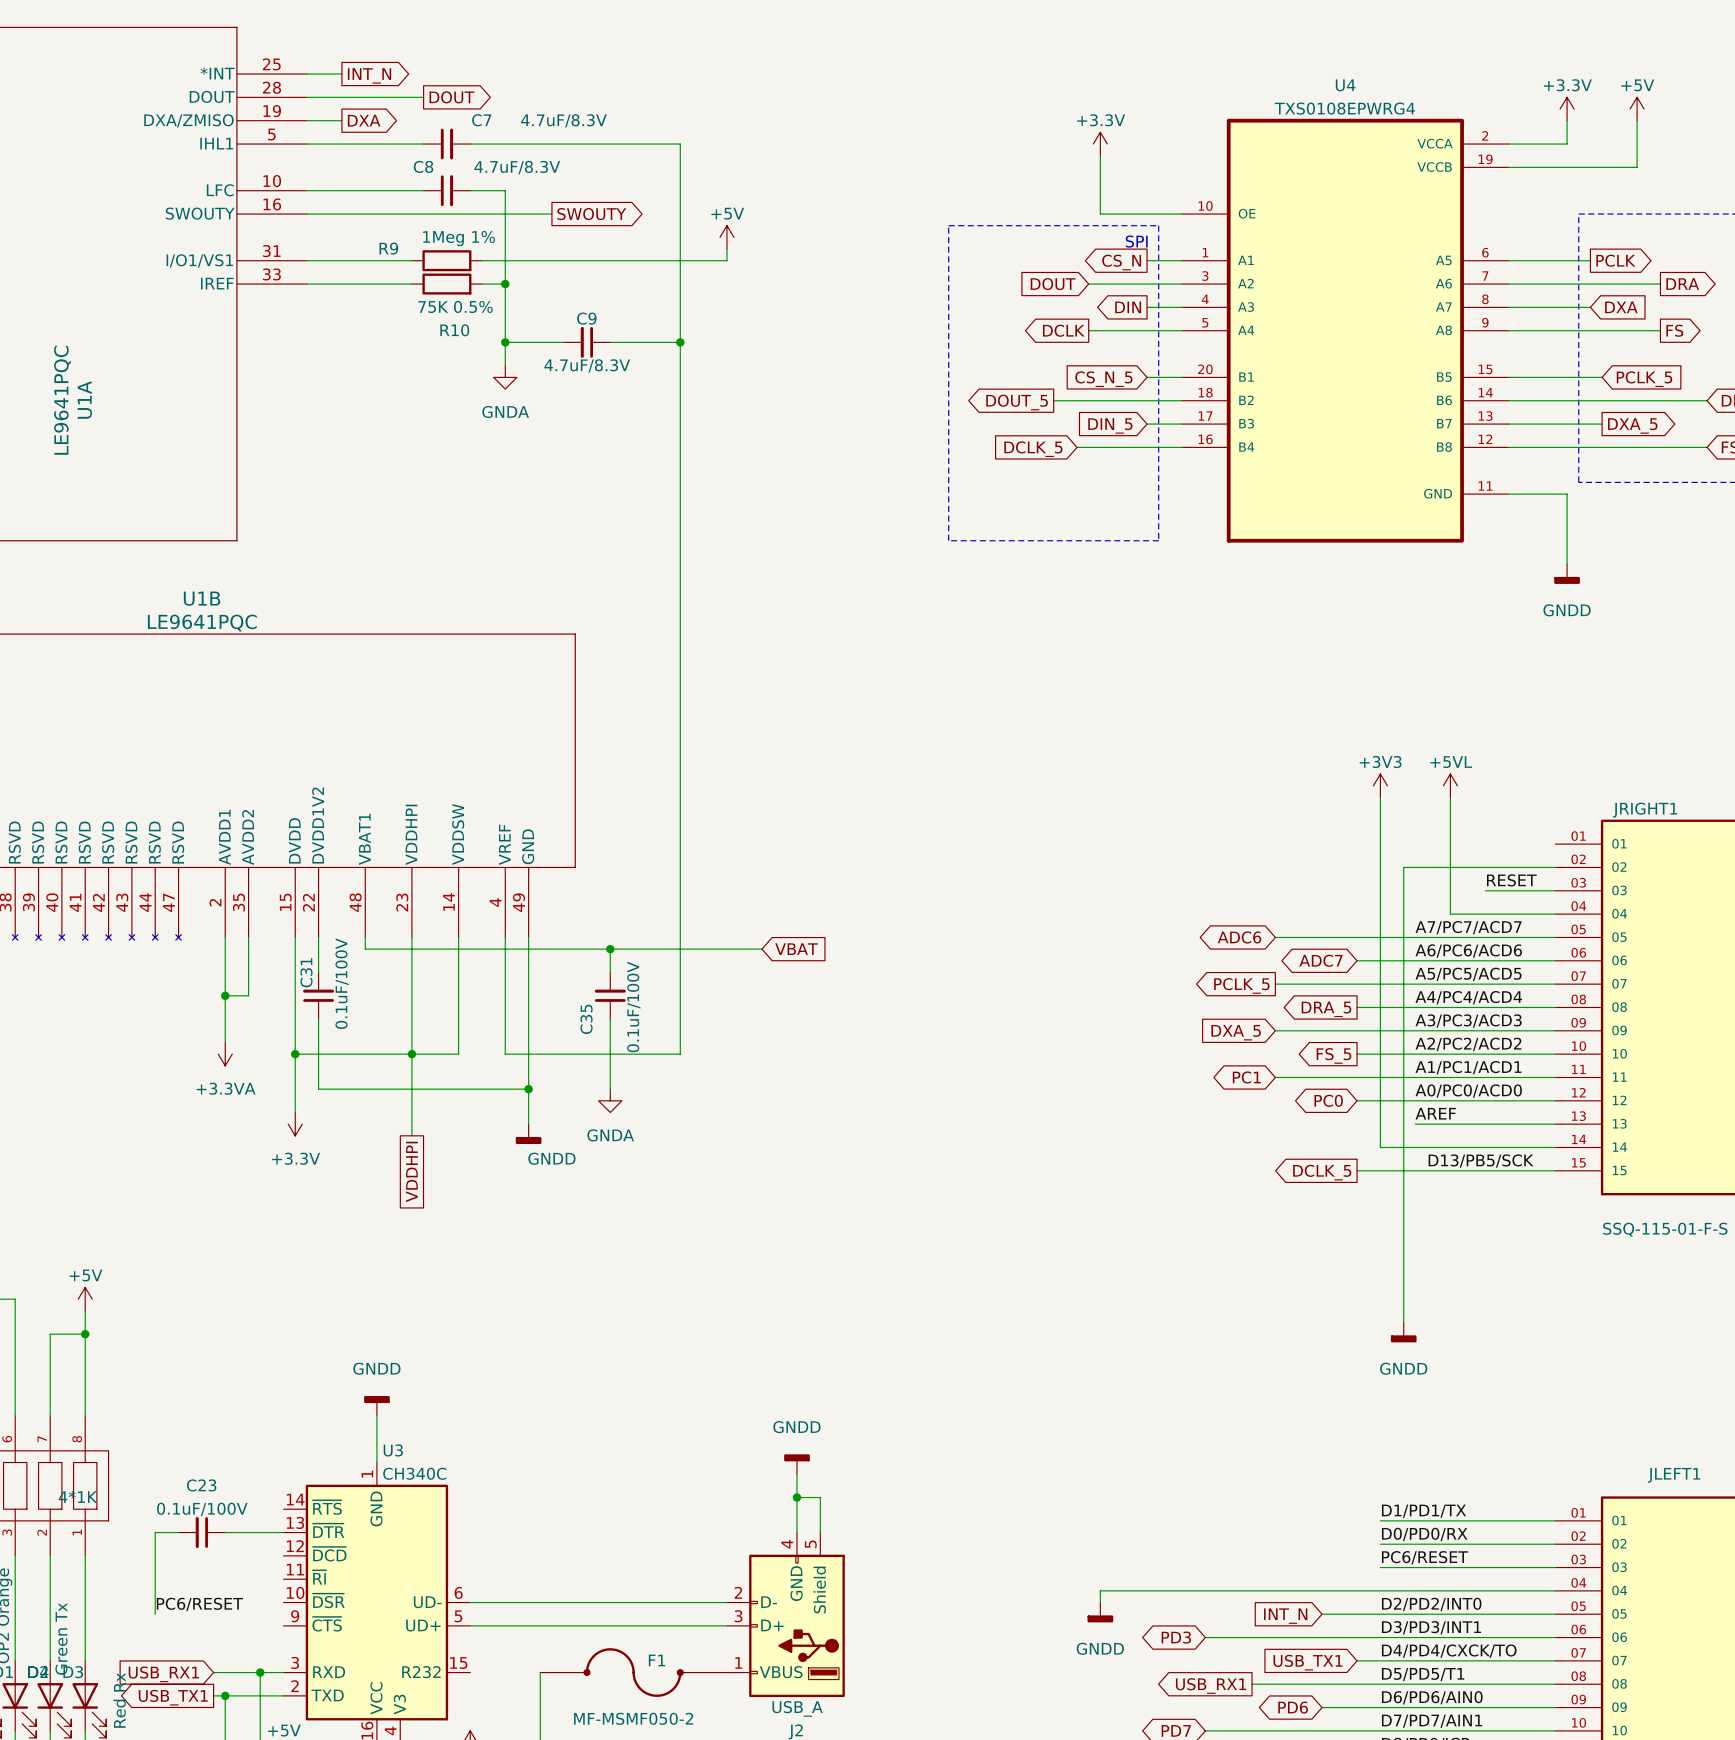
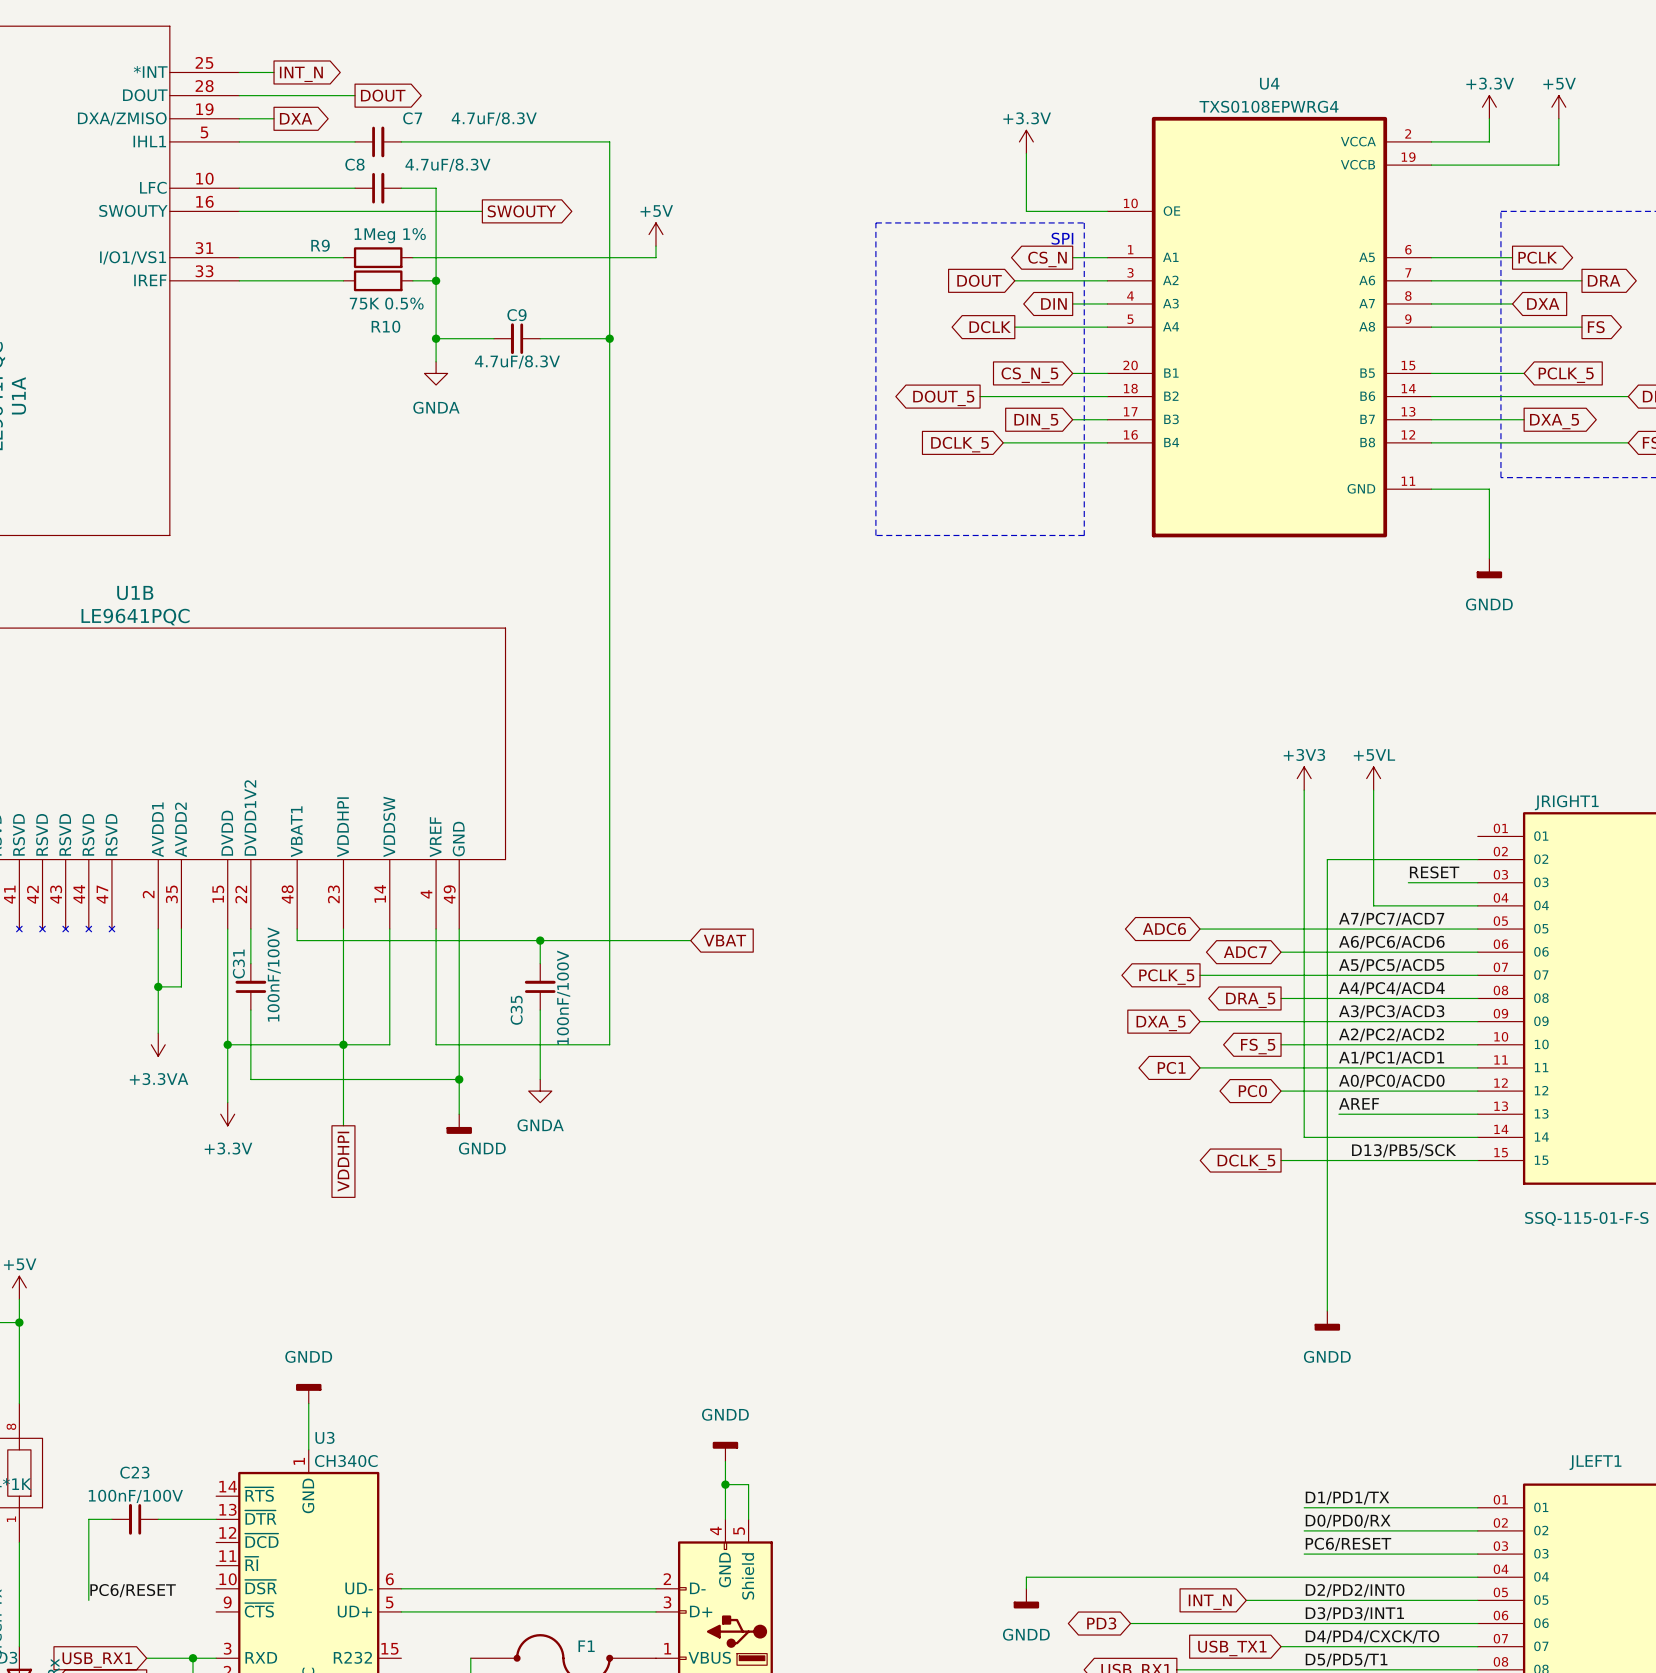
C31 value: 0.1uF/100V (342, 983) -> 100nF/100V (274, 974)
C35 value: 0.1uF/100V (633, 1007) -> 100nF/100V (563, 997)
C23 value: 0.1uF/100V (202, 1509) -> 100nF/100V (135, 1496)

